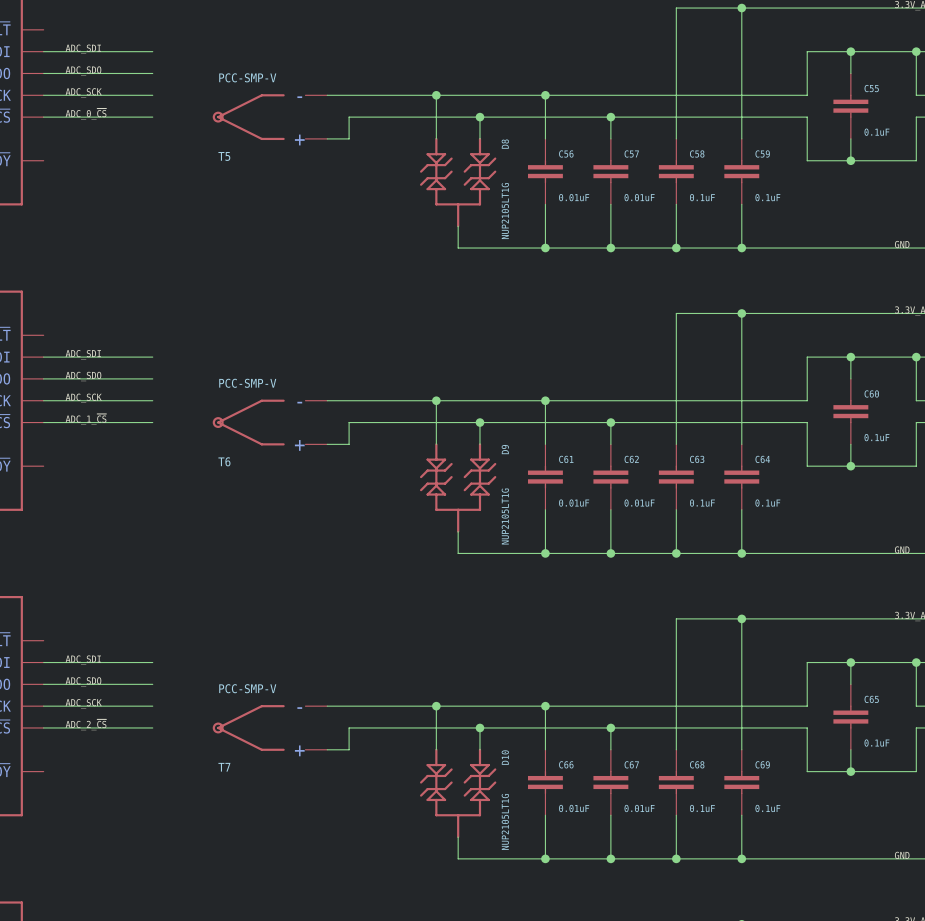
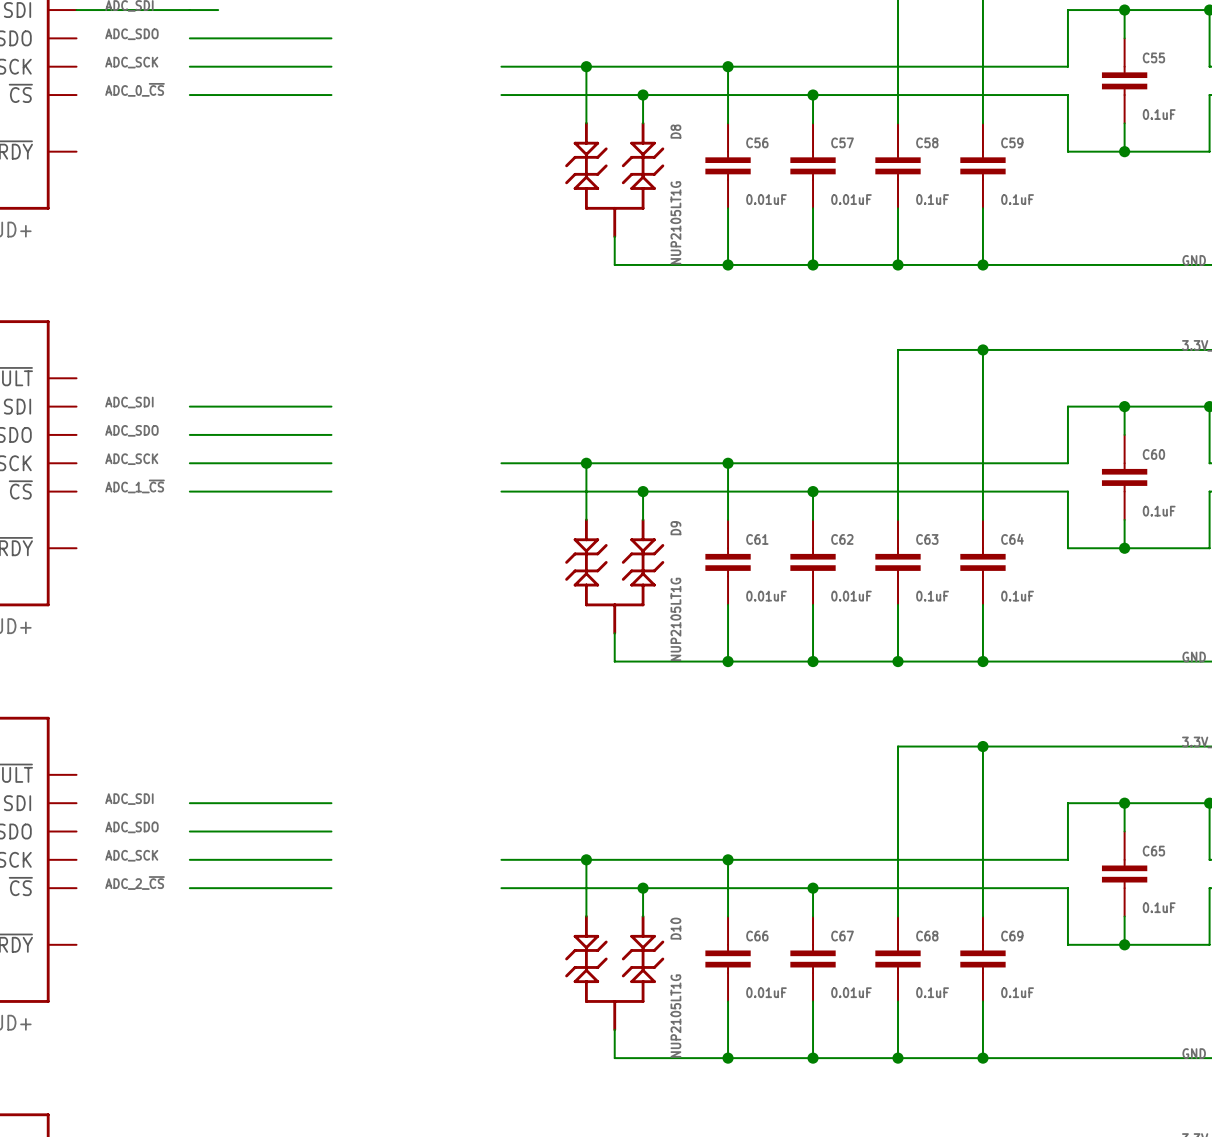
wire: (43, 73) (130, 73) -> (218, 38) (331, 38)
wire: (43, 95) (130, 95) -> (218, 66) (331, 66)
wire: (327, 95) (370, 95) -> none
wire: (43, 117) (130, 117) -> (218, 95) (331, 95)
T5: PCC-SMP-V (270, 117) -> none
wire: (370, 117) (349, 117) (349, 138) (327, 138) -> none
wire: (43, 357) (130, 357) -> (218, 406) (331, 406)
wire: (43, 378) (130, 378) -> (218, 434) (331, 434)
wire: (43, 400) (130, 400) -> (218, 463) (331, 463)
wire: (327, 400) (370, 400) -> none
wire: (43, 422) (130, 422) -> (218, 491) (331, 491)
T6: PCC-SMP-V (270, 422) -> none
wire: (370, 422) (349, 422) (349, 444) (327, 444) -> none
wire: (43, 662) (130, 662) -> (218, 803) (331, 803)
wire: (43, 684) (130, 684) -> (218, 831) (331, 831)
wire: (43, 706) (130, 706) -> (218, 859) (331, 859)
wire: (327, 706) (370, 706) -> none
wire: (43, 727) (130, 727) -> (218, 888) (331, 888)
T7: PCC-SMP-V (270, 727) -> none
wire: (370, 727) (349, 727) (349, 749) (327, 749) -> none

